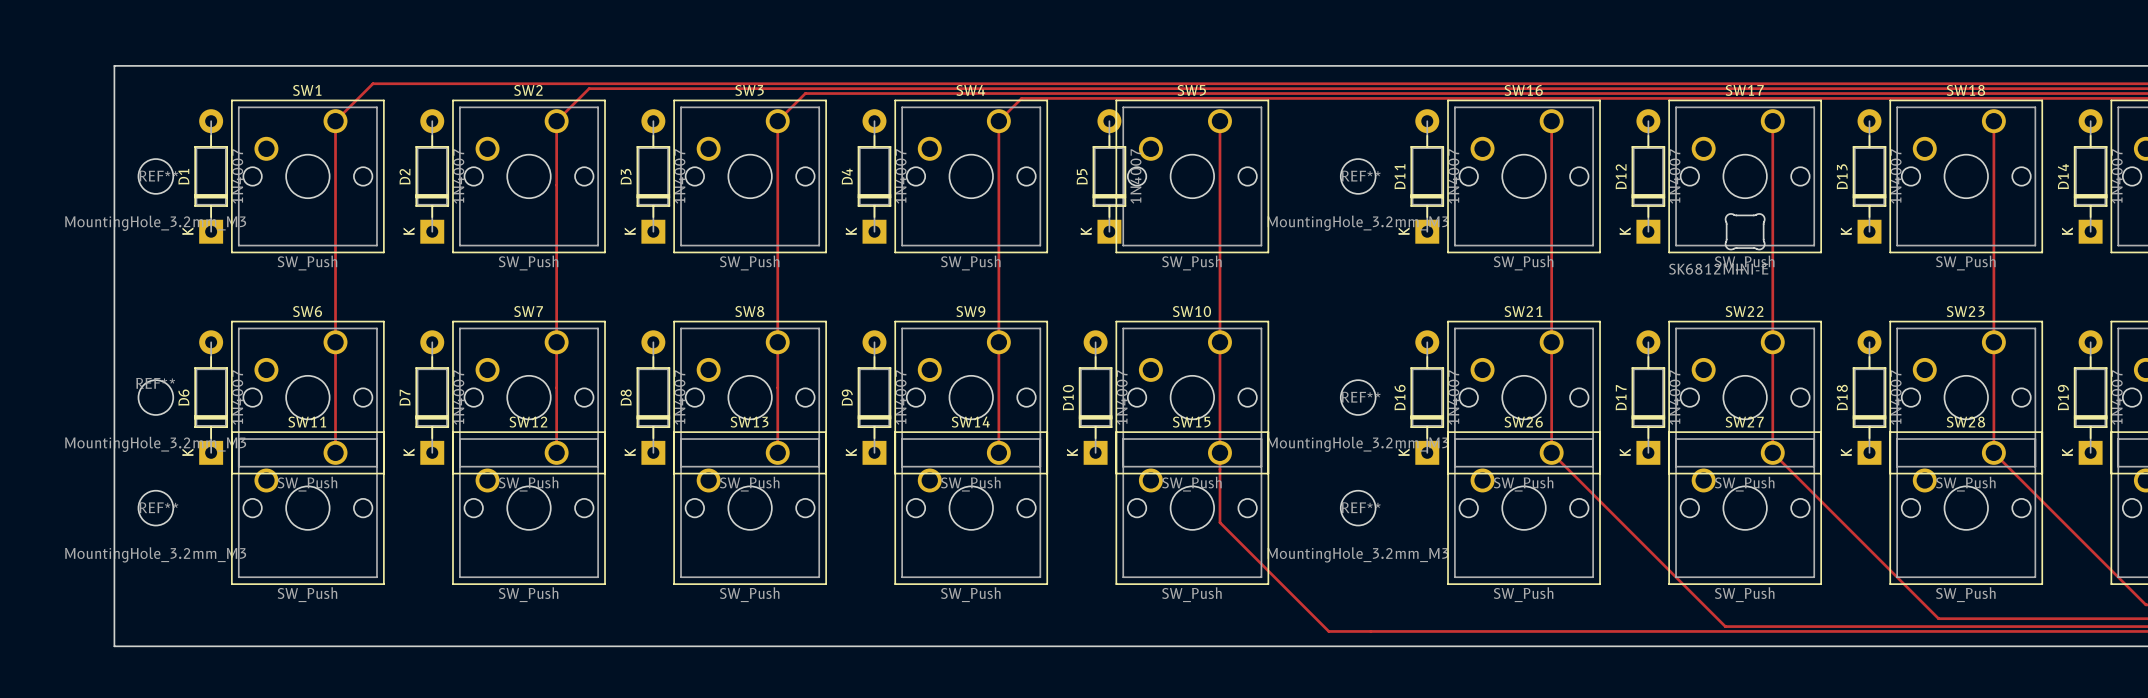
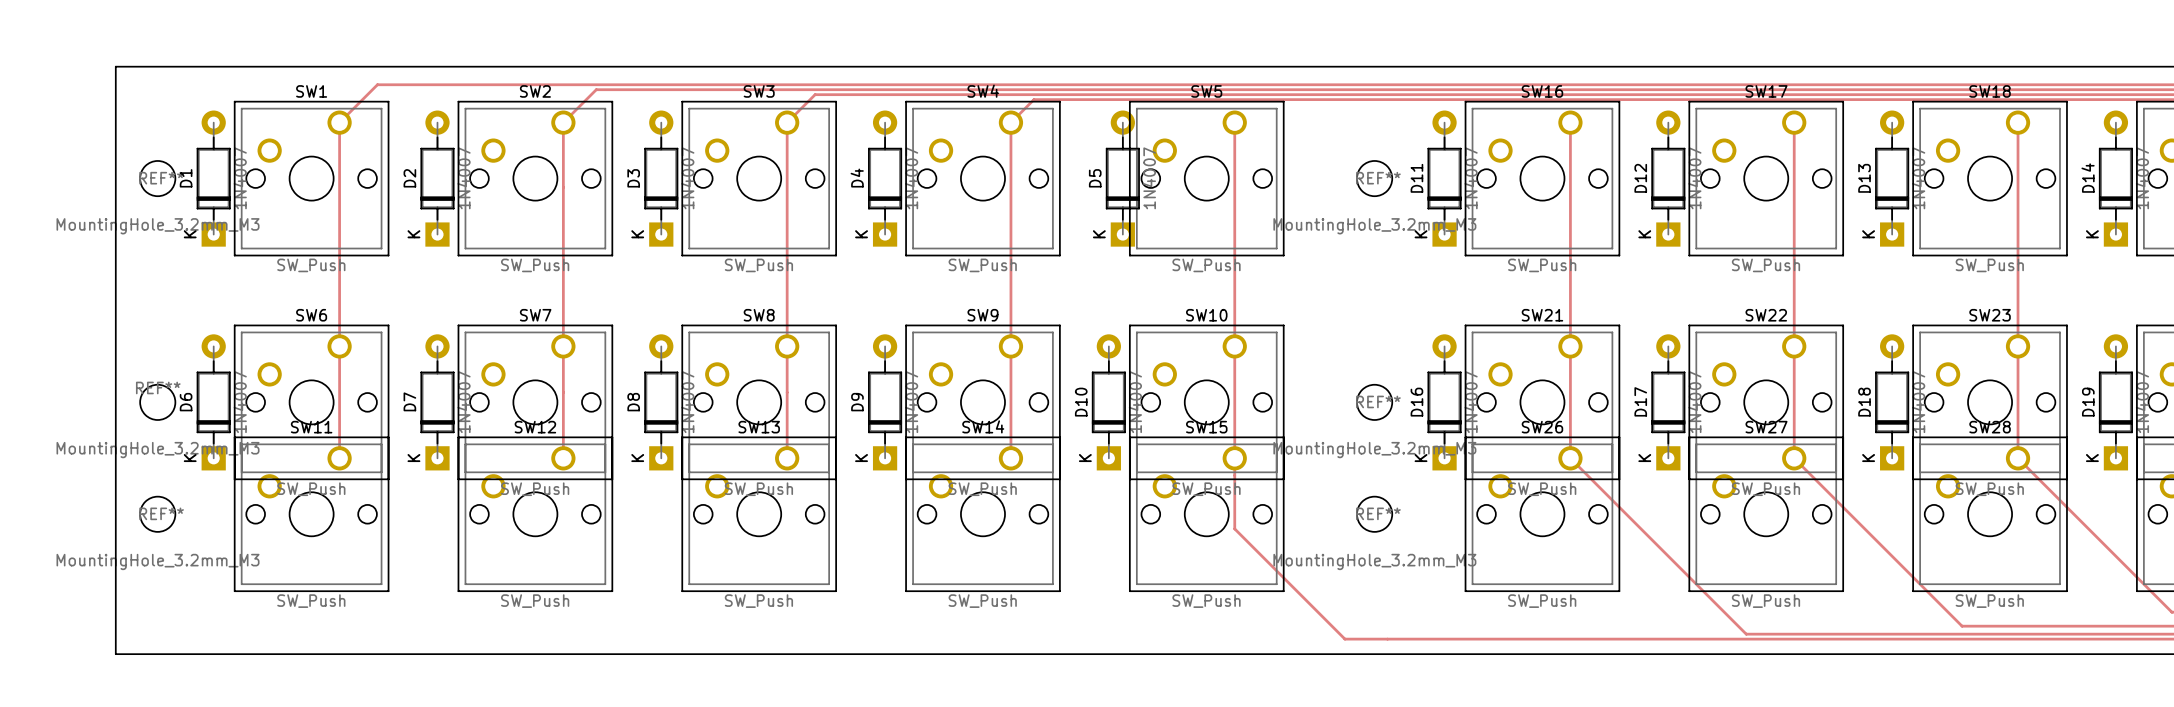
part: SK6812MINI-E (1745, 231) -> none

